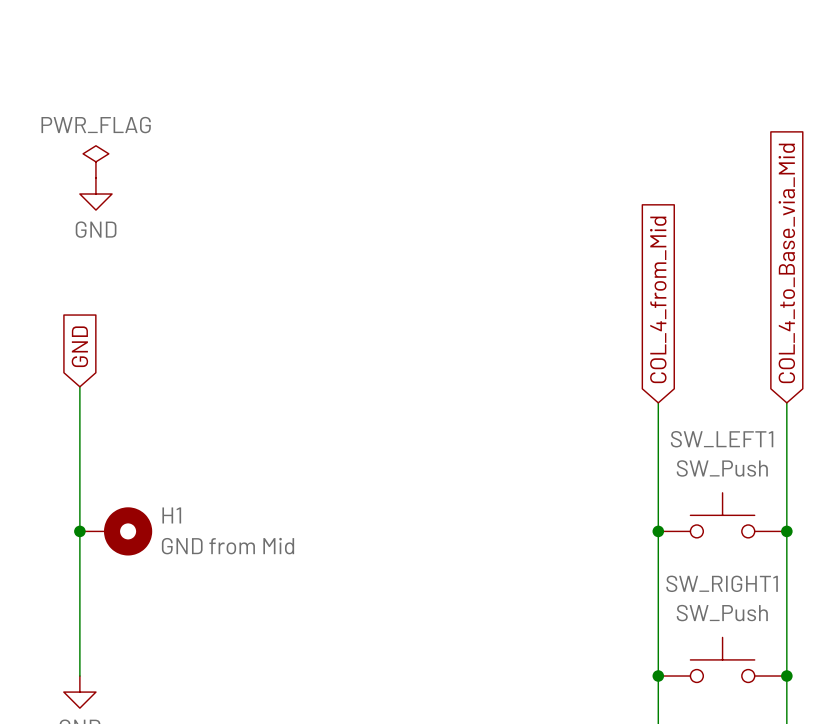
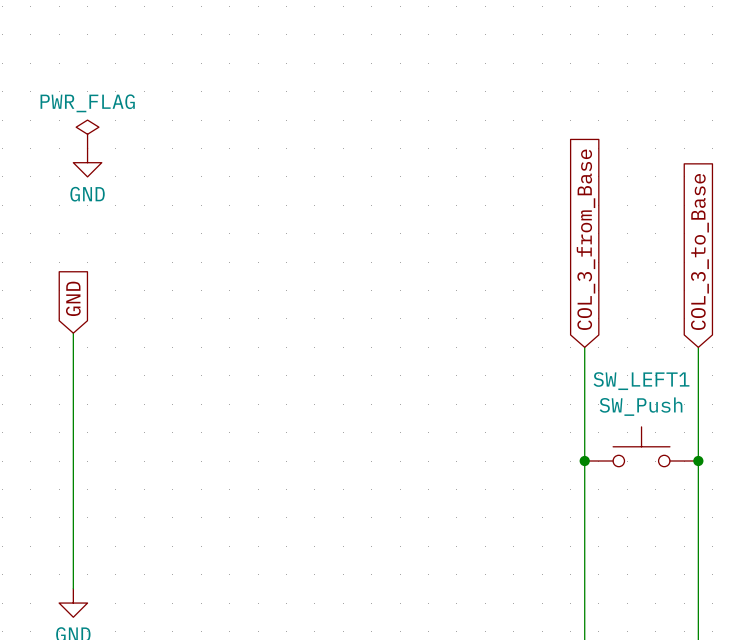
global label: COL_4_to_Base_via_Mid (786, 263) -> COL_3_to_Base (699, 251)
global label: COL_4_from_Mid (658, 299) -> COL_3_from_Base (586, 239)
junction: (79, 531) -> none
H1: GND from Mid (116, 531) -> none
SW_RIGHT1: SW_Push (722, 659) -> none
junction: (658, 676) -> none
junction: (786, 676) -> none

